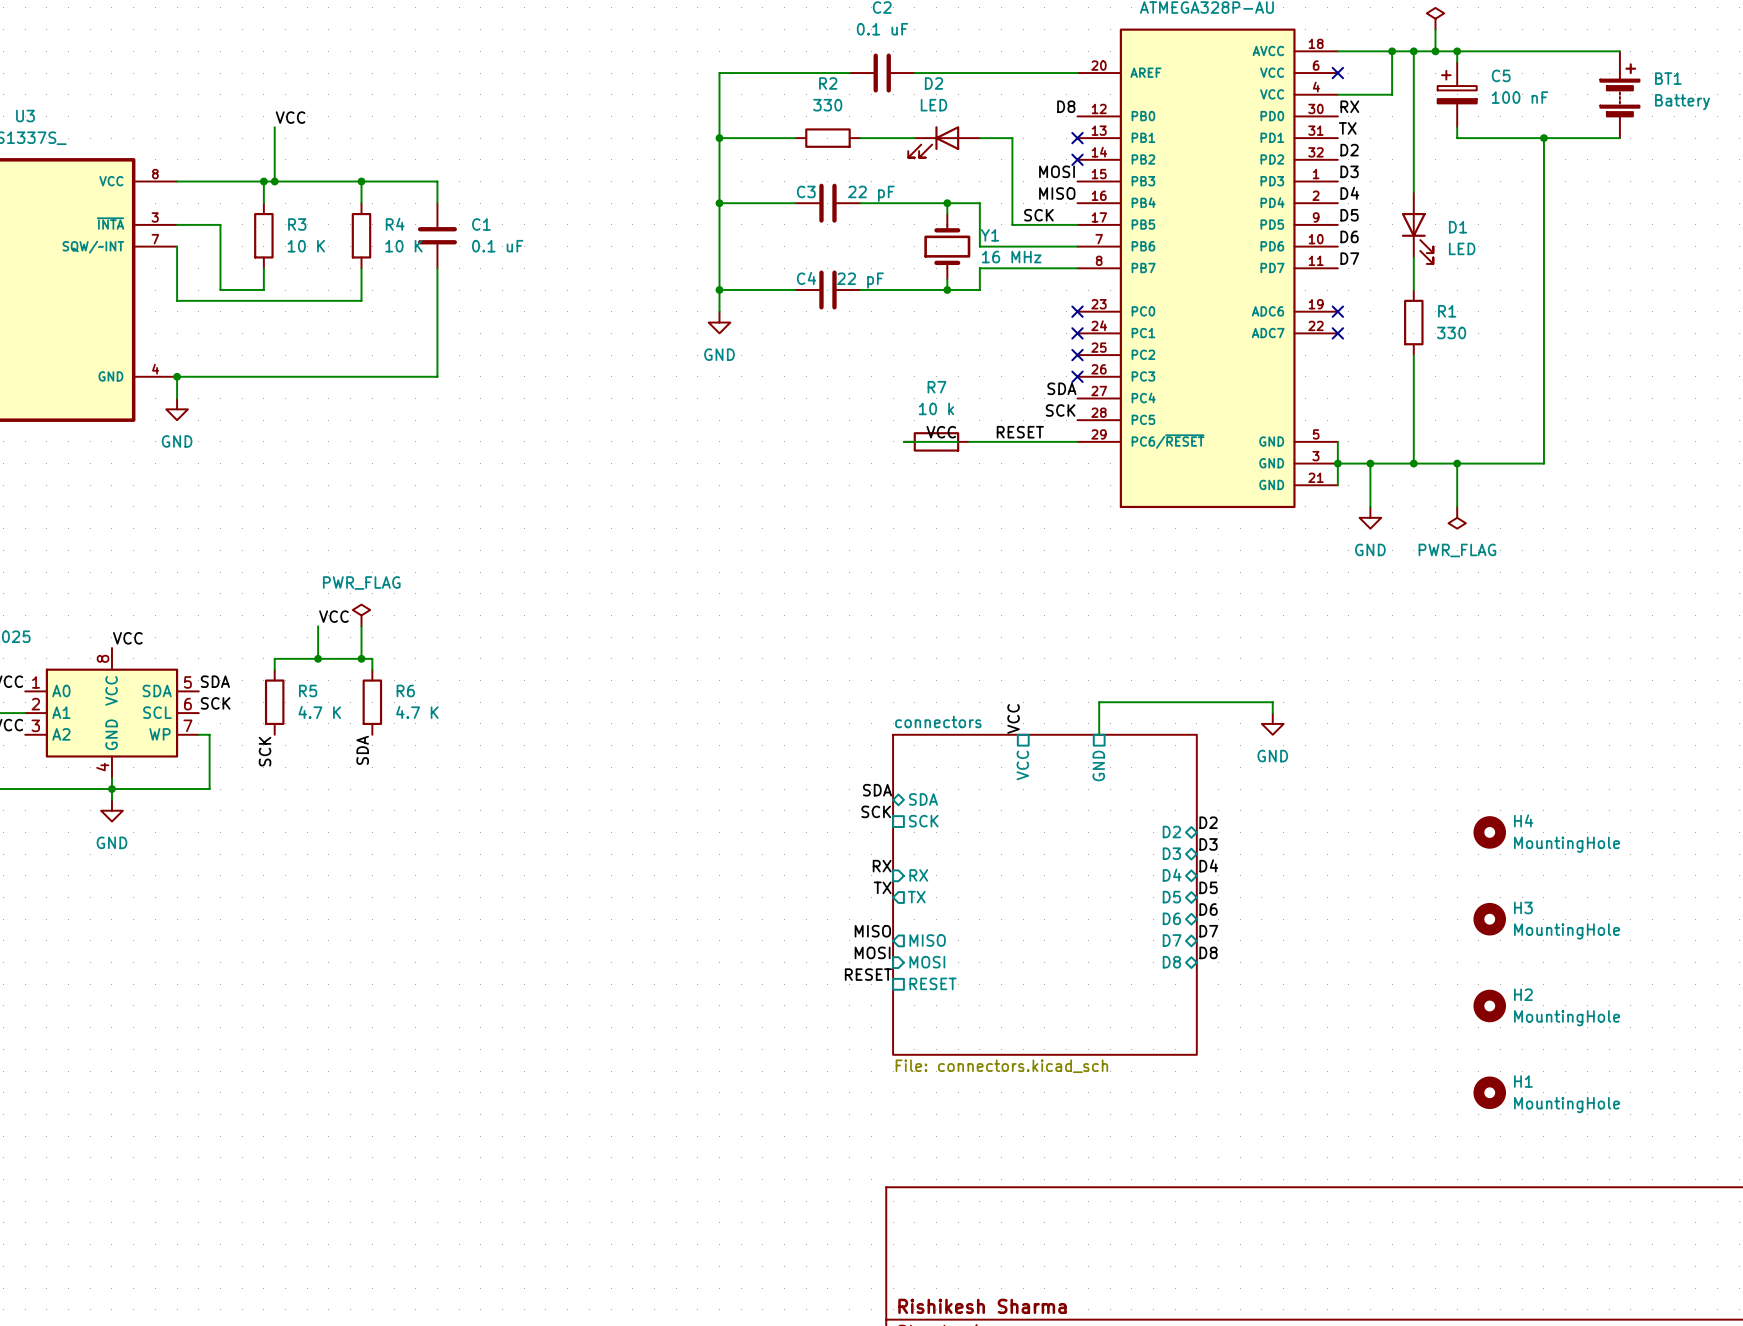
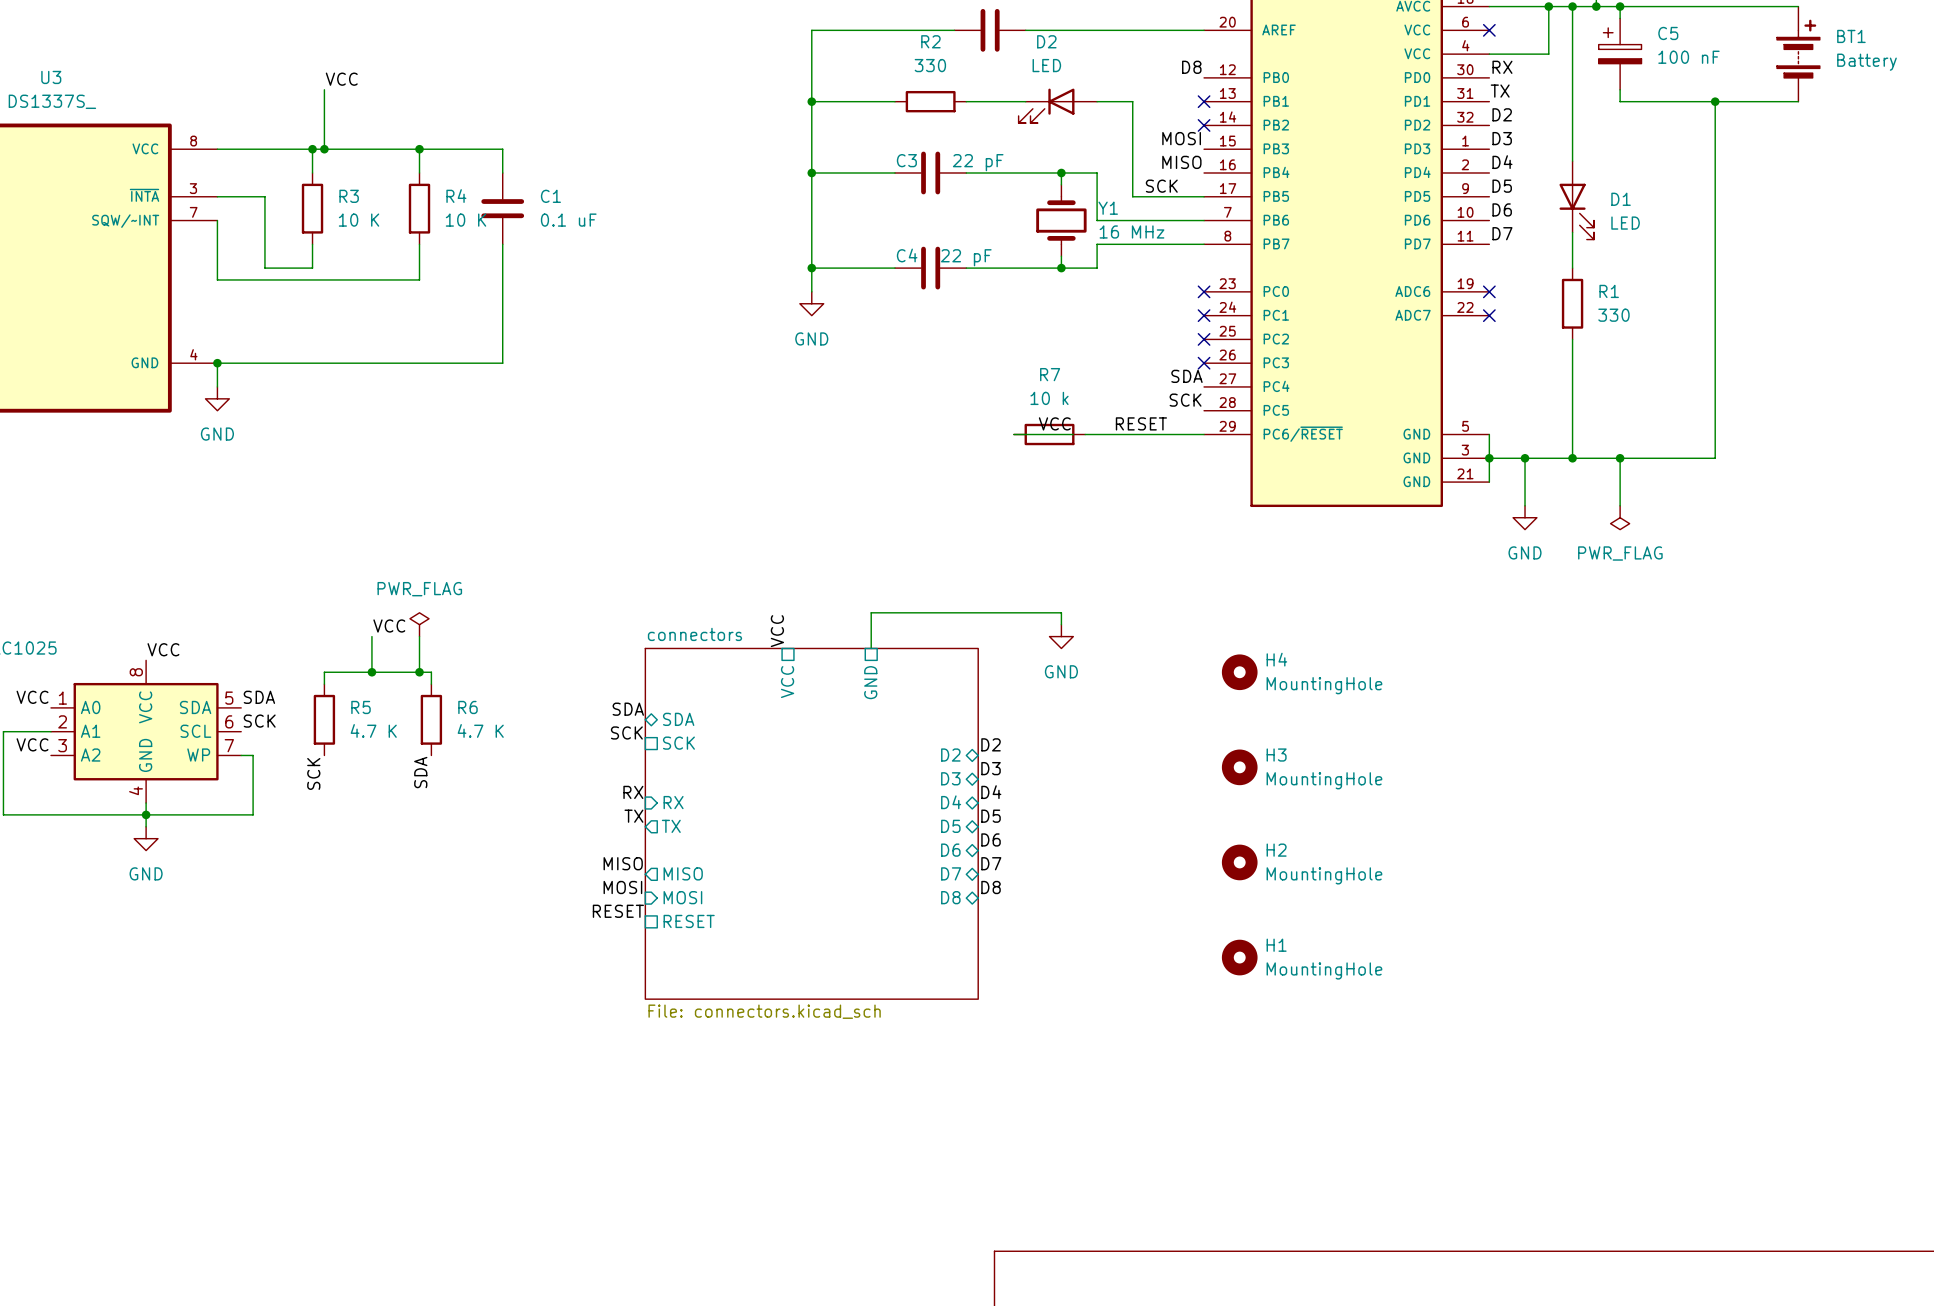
wire: none -> (1061, 624) (1061, 612) (871, 612) (871, 648)
label: none -> VCC (777, 631)
power symbol: none -> GND (1061, 636)
sheet pin: none -> VCC (787, 682)
sheet pin: none -> GND (870, 682)
label: none -> SDA (628, 709)
sheet pin: none -> SDA (678, 719)
wire: (1272, 713) (1272, 702) (1099, 702) (1099, 734) -> none
label: none -> SCK (626, 732)
label: VCC (1013, 718) -> none
sheet pin: none -> SCK (678, 743)
power symbol: GND (1272, 723) -> none
label: none -> D2 (991, 744)
sheet pin: none -> D2 (950, 755)
label: none -> D3 (991, 768)
sheet pin: none -> D3 (950, 778)
sheet pin: VCC (1022, 765) -> none
sheet pin: GND (1098, 765) -> none
label: none -> RX (633, 792)
label: none -> D4 (991, 792)
sheet pin: none -> RX (673, 802)
sheet pin: none -> D4 (951, 802)
label: none -> TX (633, 816)
label: SDA (877, 790) -> none
label: none -> D5 (991, 816)
sheet connectors: none -> File: connectors.kicad_sch (811, 823)
sheet pin: none -> TX (671, 826)
sheet pin: none -> D5 (950, 826)
sheet pin: SDA (923, 799) -> none
label: SCK (876, 811) -> none
label: none -> D6 (991, 839)
sheet pin: none -> D6 (950, 850)
sheet pin: SCK (923, 821) -> none
label: D2 (1208, 822) -> none
sheet pin: D2 (1171, 832) -> none
H4 position: (1489, 832) -> (1239, 672)
label: none -> MISO (623, 863)
label: none -> D7 (991, 863)
sheet pin: none -> MISO (683, 873)
sheet pin: none -> D7 (951, 873)
label: D3 (1208, 844) -> none
sheet pin: D3 (1171, 853) -> none
label: none -> MOSI (622, 887)
label: none -> D8 (991, 887)
sheet pin: none -> MOSI (682, 897)
sheet pin: none -> D8 (950, 897)
label: D4 (1208, 865) -> none
label: RX (882, 866) -> none
sheet pin: RX (918, 875) -> none
sheet pin: D4 (1172, 875) -> none
label: none -> RESET (618, 911)
sheet pin: none -> RESET (689, 921)
label: TX (882, 887) -> none
label: D5 (1208, 887) -> none
sheet connectors: File: connectors.kicad_sch (1044, 894) -> none
sheet pin: TX (916, 897) -> none
sheet pin: D5 (1171, 897) -> none
label: D6 (1208, 909) -> none
sheet pin: D6 (1171, 918) -> none
H3 position: (1489, 919) -> (1239, 767)
label: MISO (872, 931) -> none
label: D7 (1208, 931) -> none
sheet pin: MISO (927, 940) -> none
sheet pin: D7 (1172, 940) -> none
label: MOSI (872, 952) -> none
label: D8 (1208, 952) -> none
sheet pin: MOSI (927, 962) -> none
sheet pin: D8 (1171, 962) -> none
label: RESET (868, 974) -> none
sheet pin: RESET (933, 983) -> none
H2 position: (1489, 1005) -> (1239, 862)
H1 position: (1489, 1092) -> (1239, 957)

